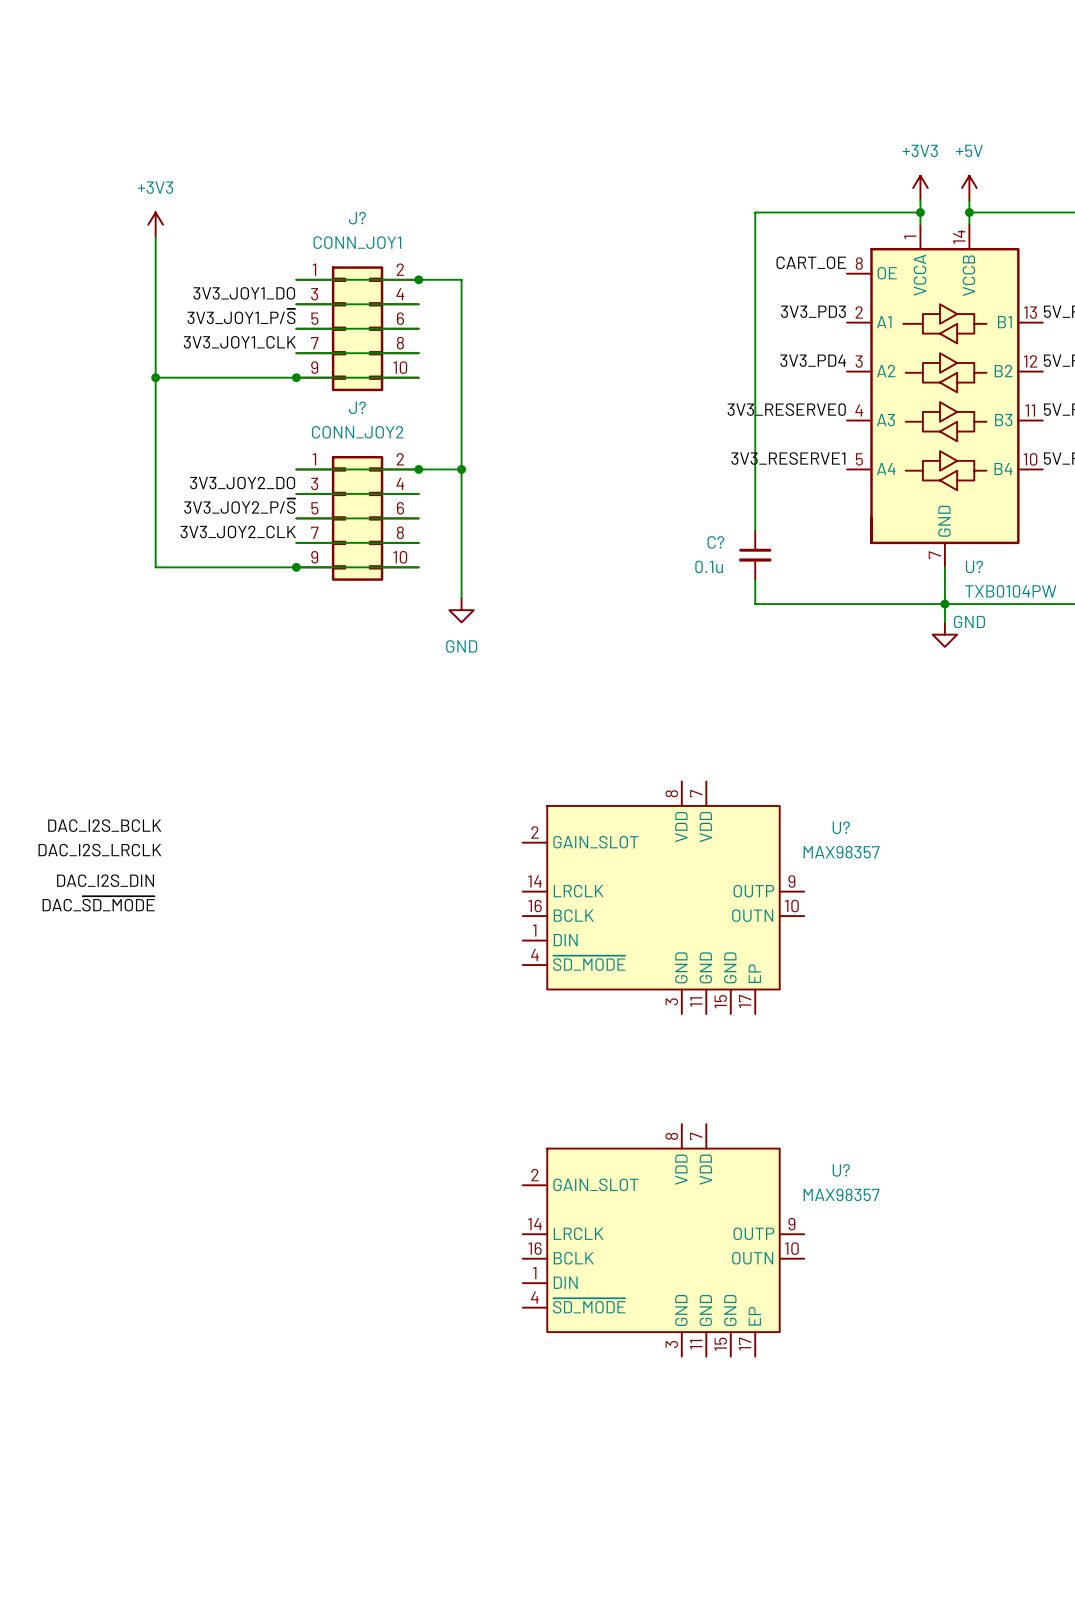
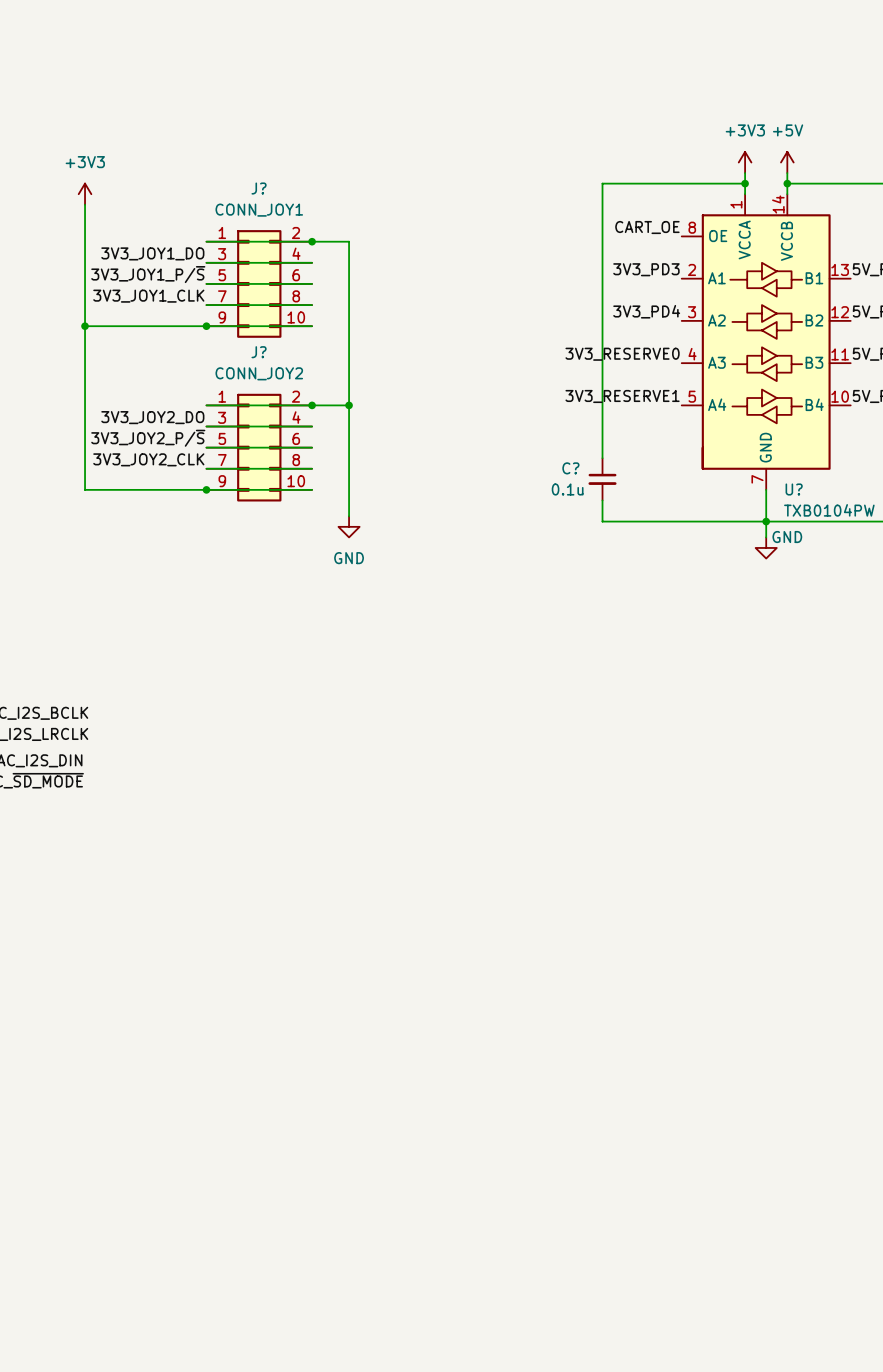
U?: MAX98357 (663, 897) -> none
U?: MAX98357 (663, 1240) -> none

